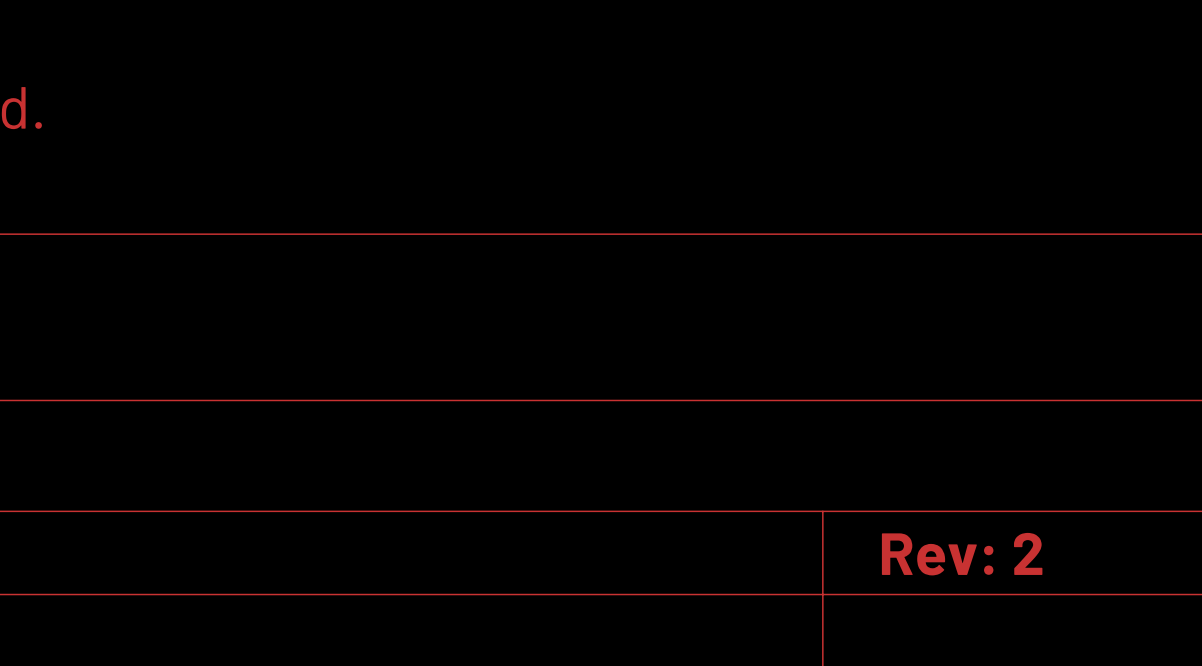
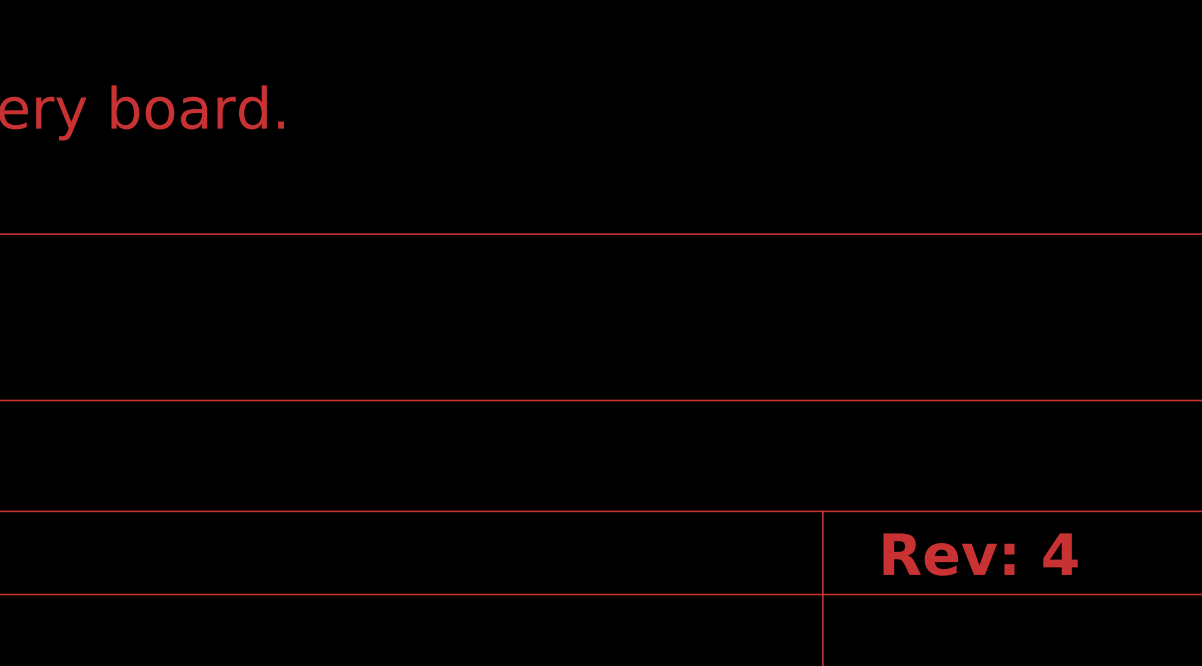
title block: Rev: 2 (962, 554) -> Rev: 4 (980, 554)

